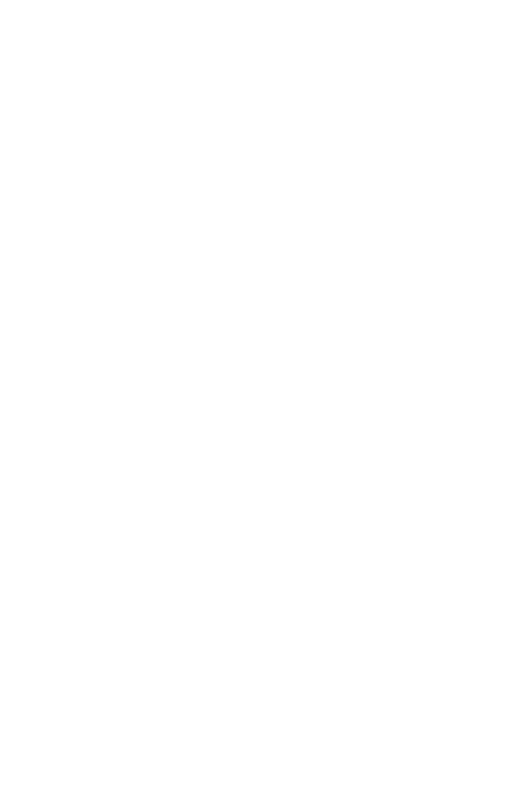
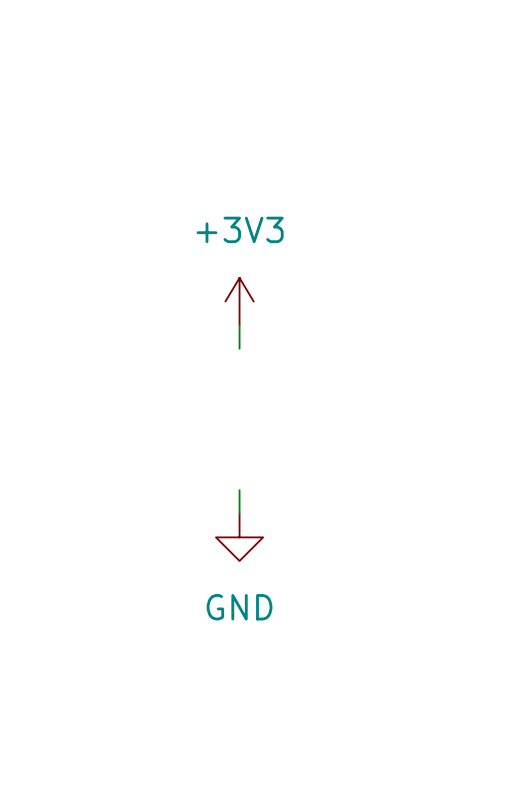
power symbol: none -> +3V3 (239, 301)
wire: none -> (239, 325) (239, 348)
wire: none -> (239, 490) (239, 513)
power symbol: none -> GND (239, 537)

